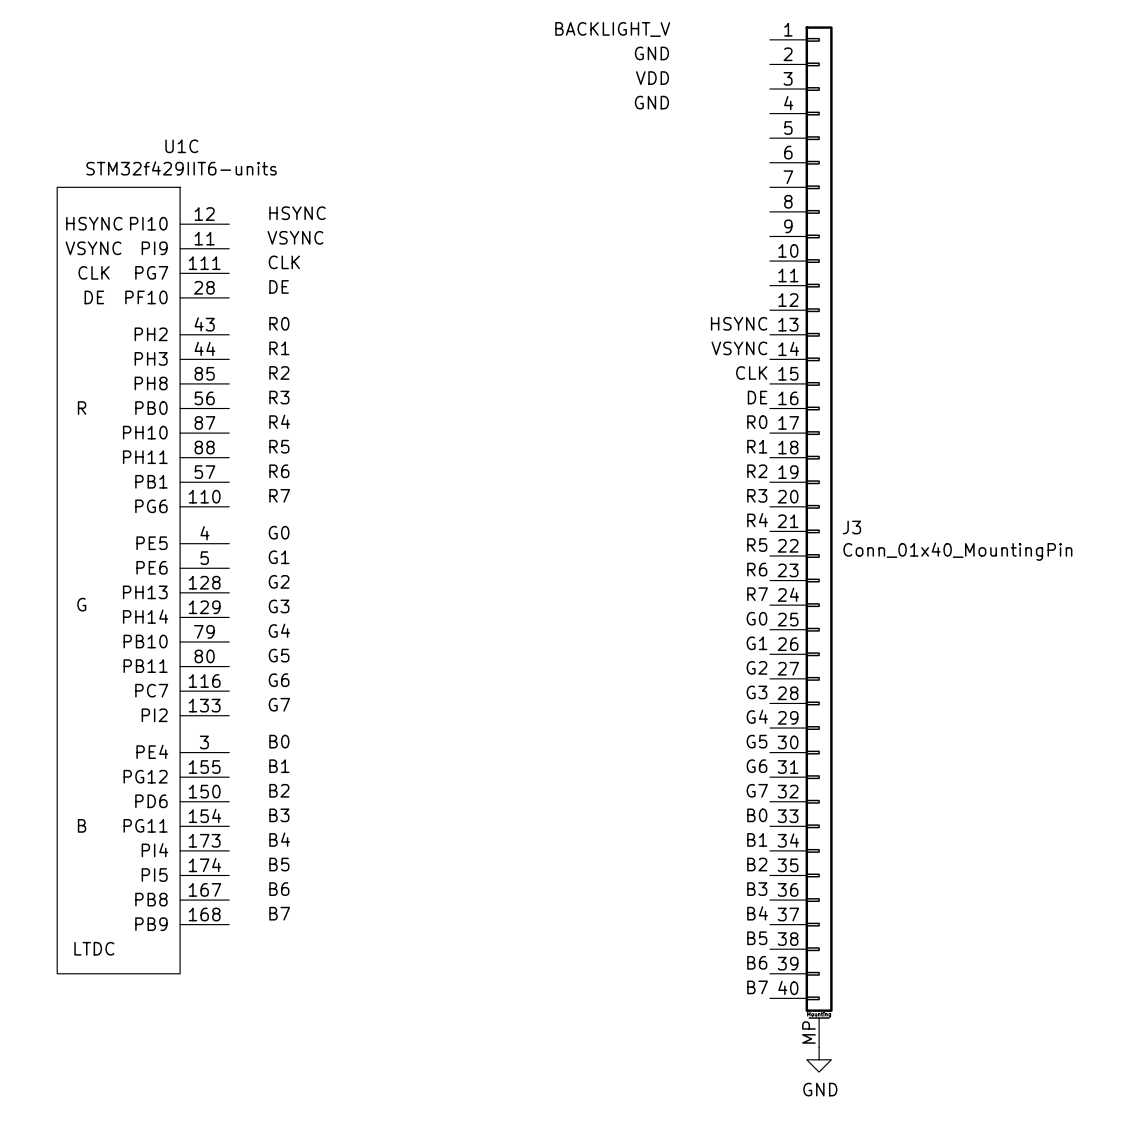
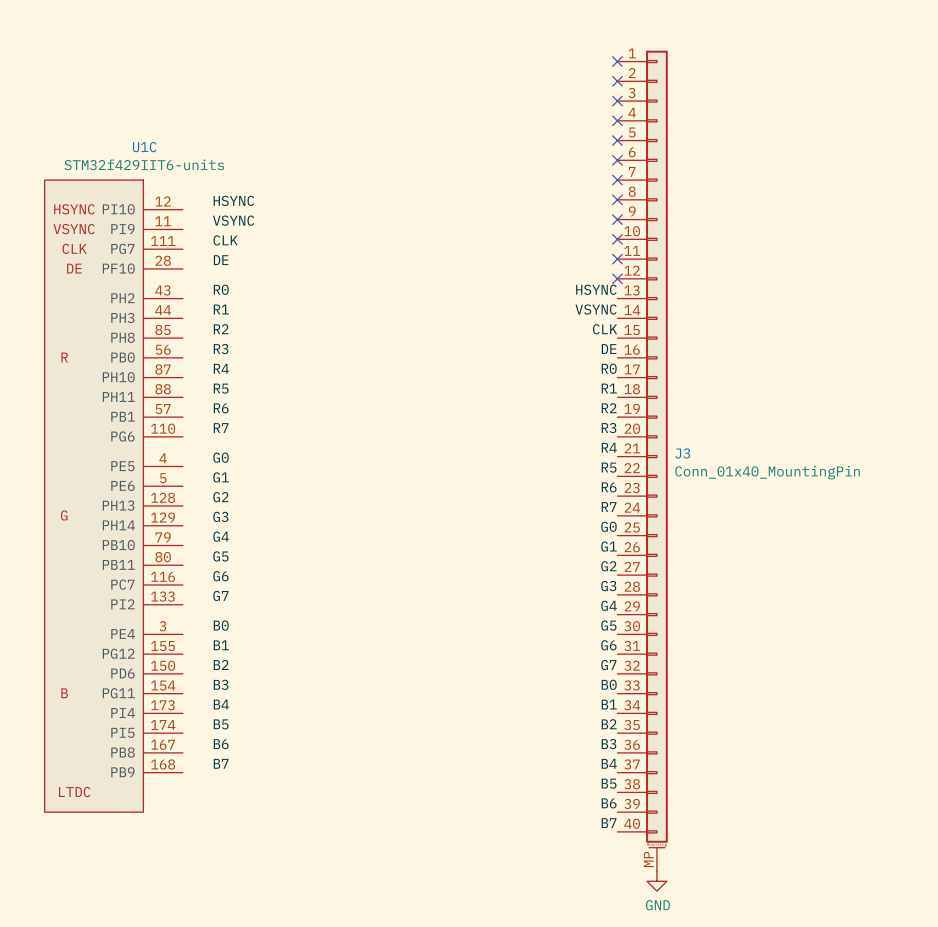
label: BACKLIGHT_V (612, 29) -> none
no-connect mark: none -> (617, 61)
label: GND (651, 53) -> none
no-connect mark: none -> (617, 81)
label: VDD (652, 78) -> none
no-connect mark: none -> (617, 101)
label: GND (651, 102) -> none
no-connect mark: none -> (617, 120)
no-connect mark: none -> (617, 140)
no-connect mark: none -> (617, 160)
no-connect mark: none -> (617, 180)
no-connect mark: none -> (617, 199)
no-connect mark: none -> (617, 219)
no-connect mark: none -> (617, 239)
no-connect mark: none -> (617, 259)
no-connect mark: none -> (617, 278)

